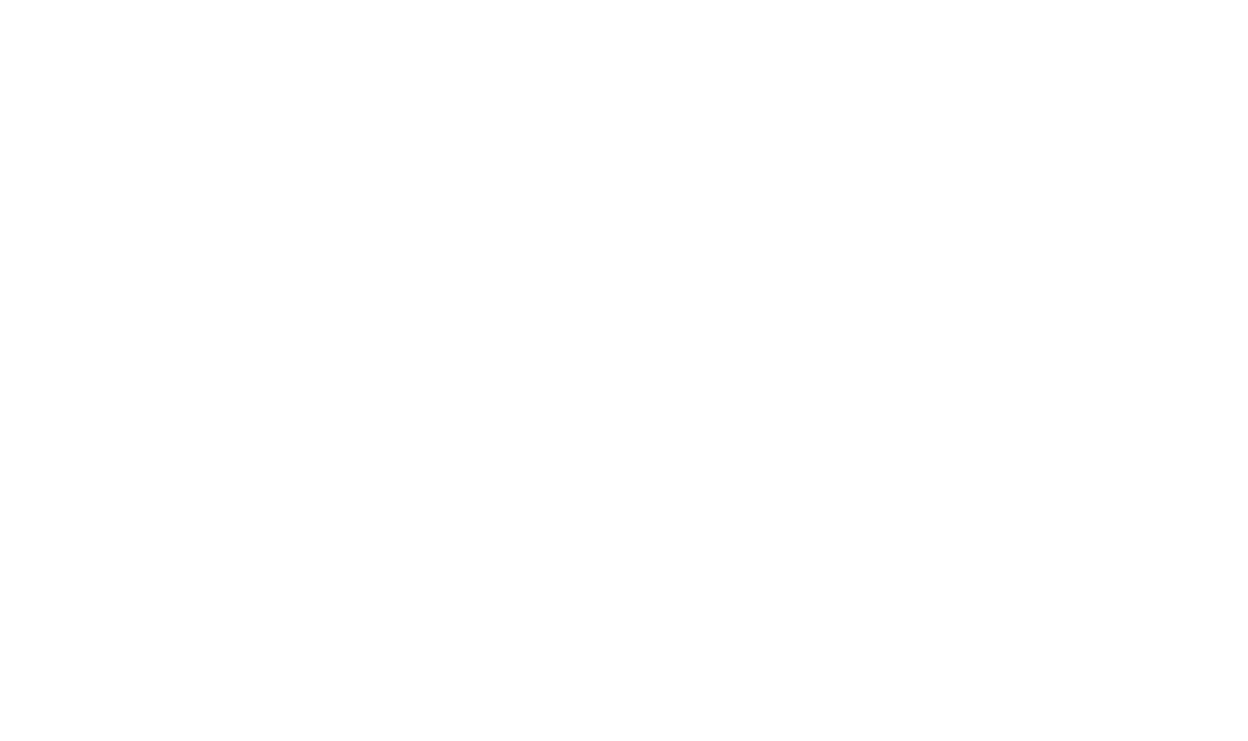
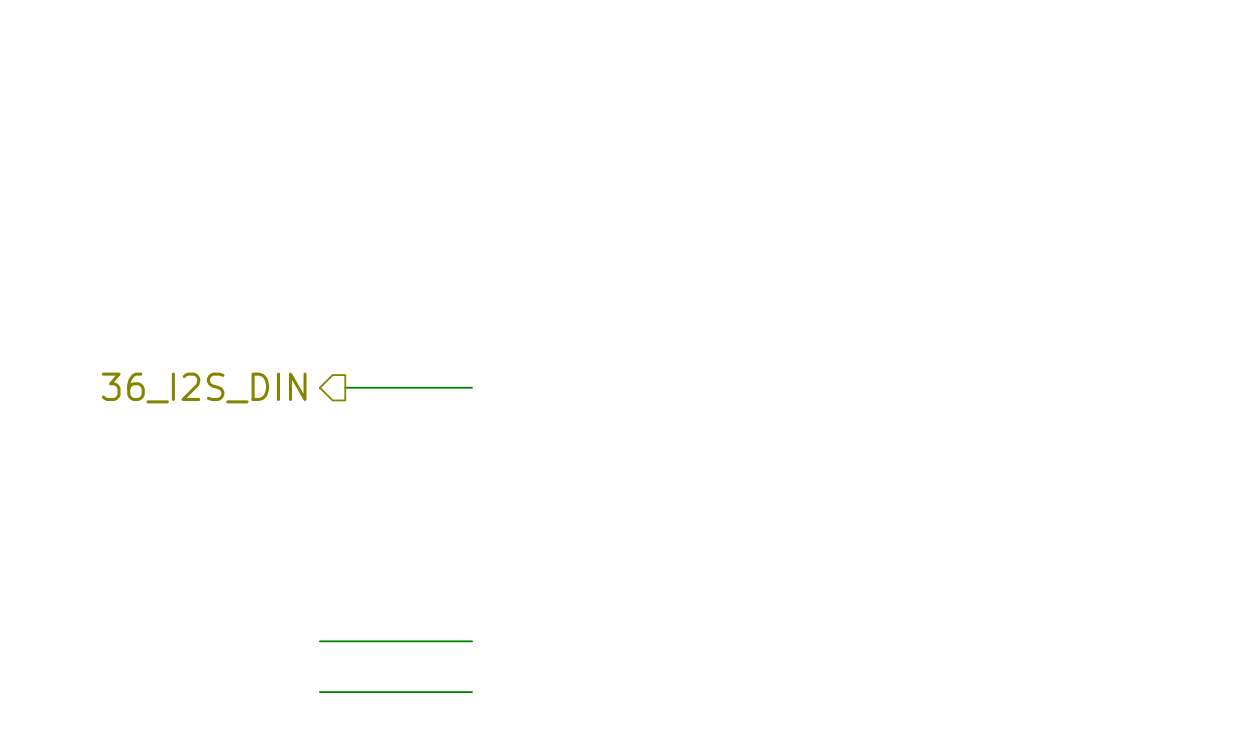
wire: none -> (345, 387) (472, 387)
hierarchical label: none -> 36_I2S_DIN (204, 388)
wire: none -> (319, 641) (472, 641)
wire: none -> (319, 692) (472, 692)

